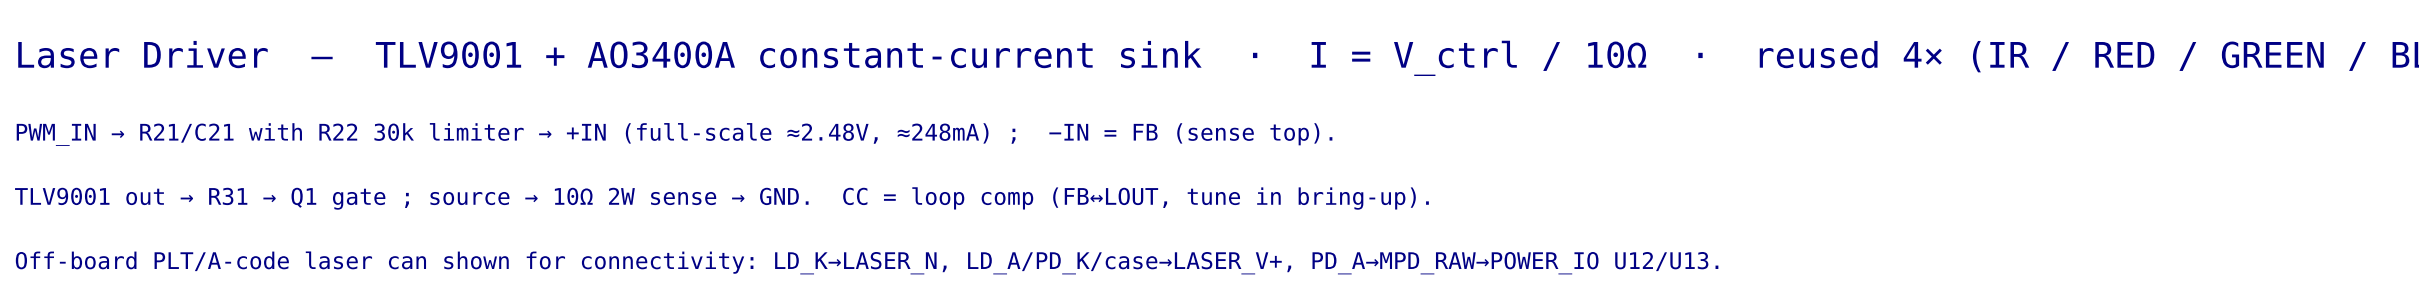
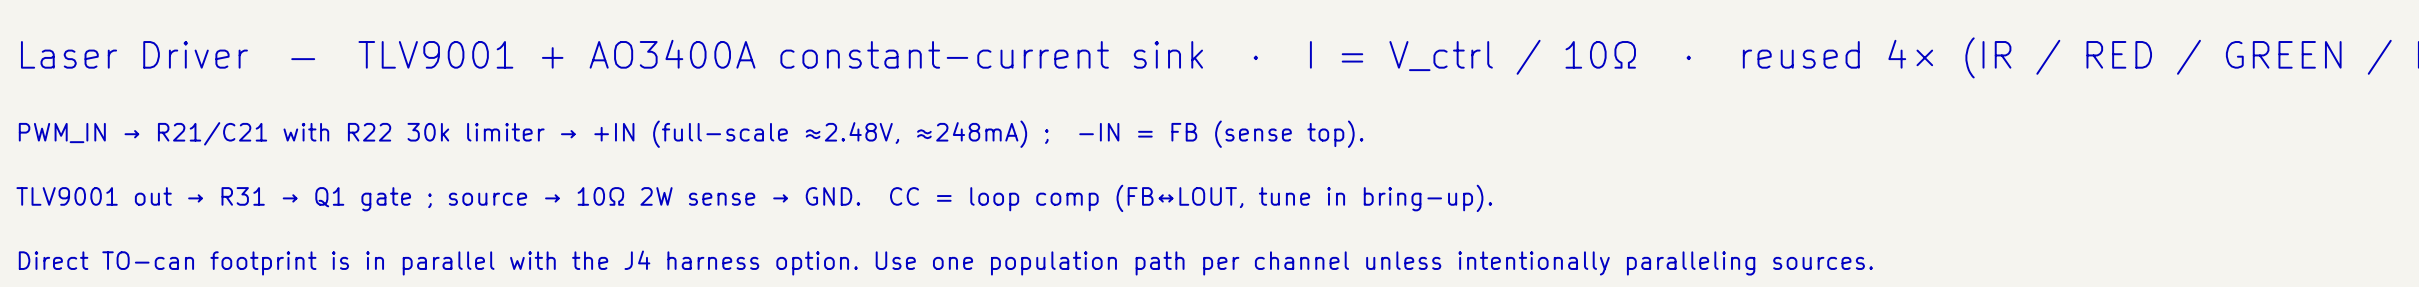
text: Off-board PLT/A-code laser can shown for connectivity: LD_K→LASER_N, LD_A/PD_K/case→LASER_V+, PD_A→MPD_RAW→POWER_IO U12/U13. (867, 262) -> Direct TO-can footprint is in parallel with the J4 harness option. Use one population path per channel unless intentionally paralleling sources. (945, 263)

